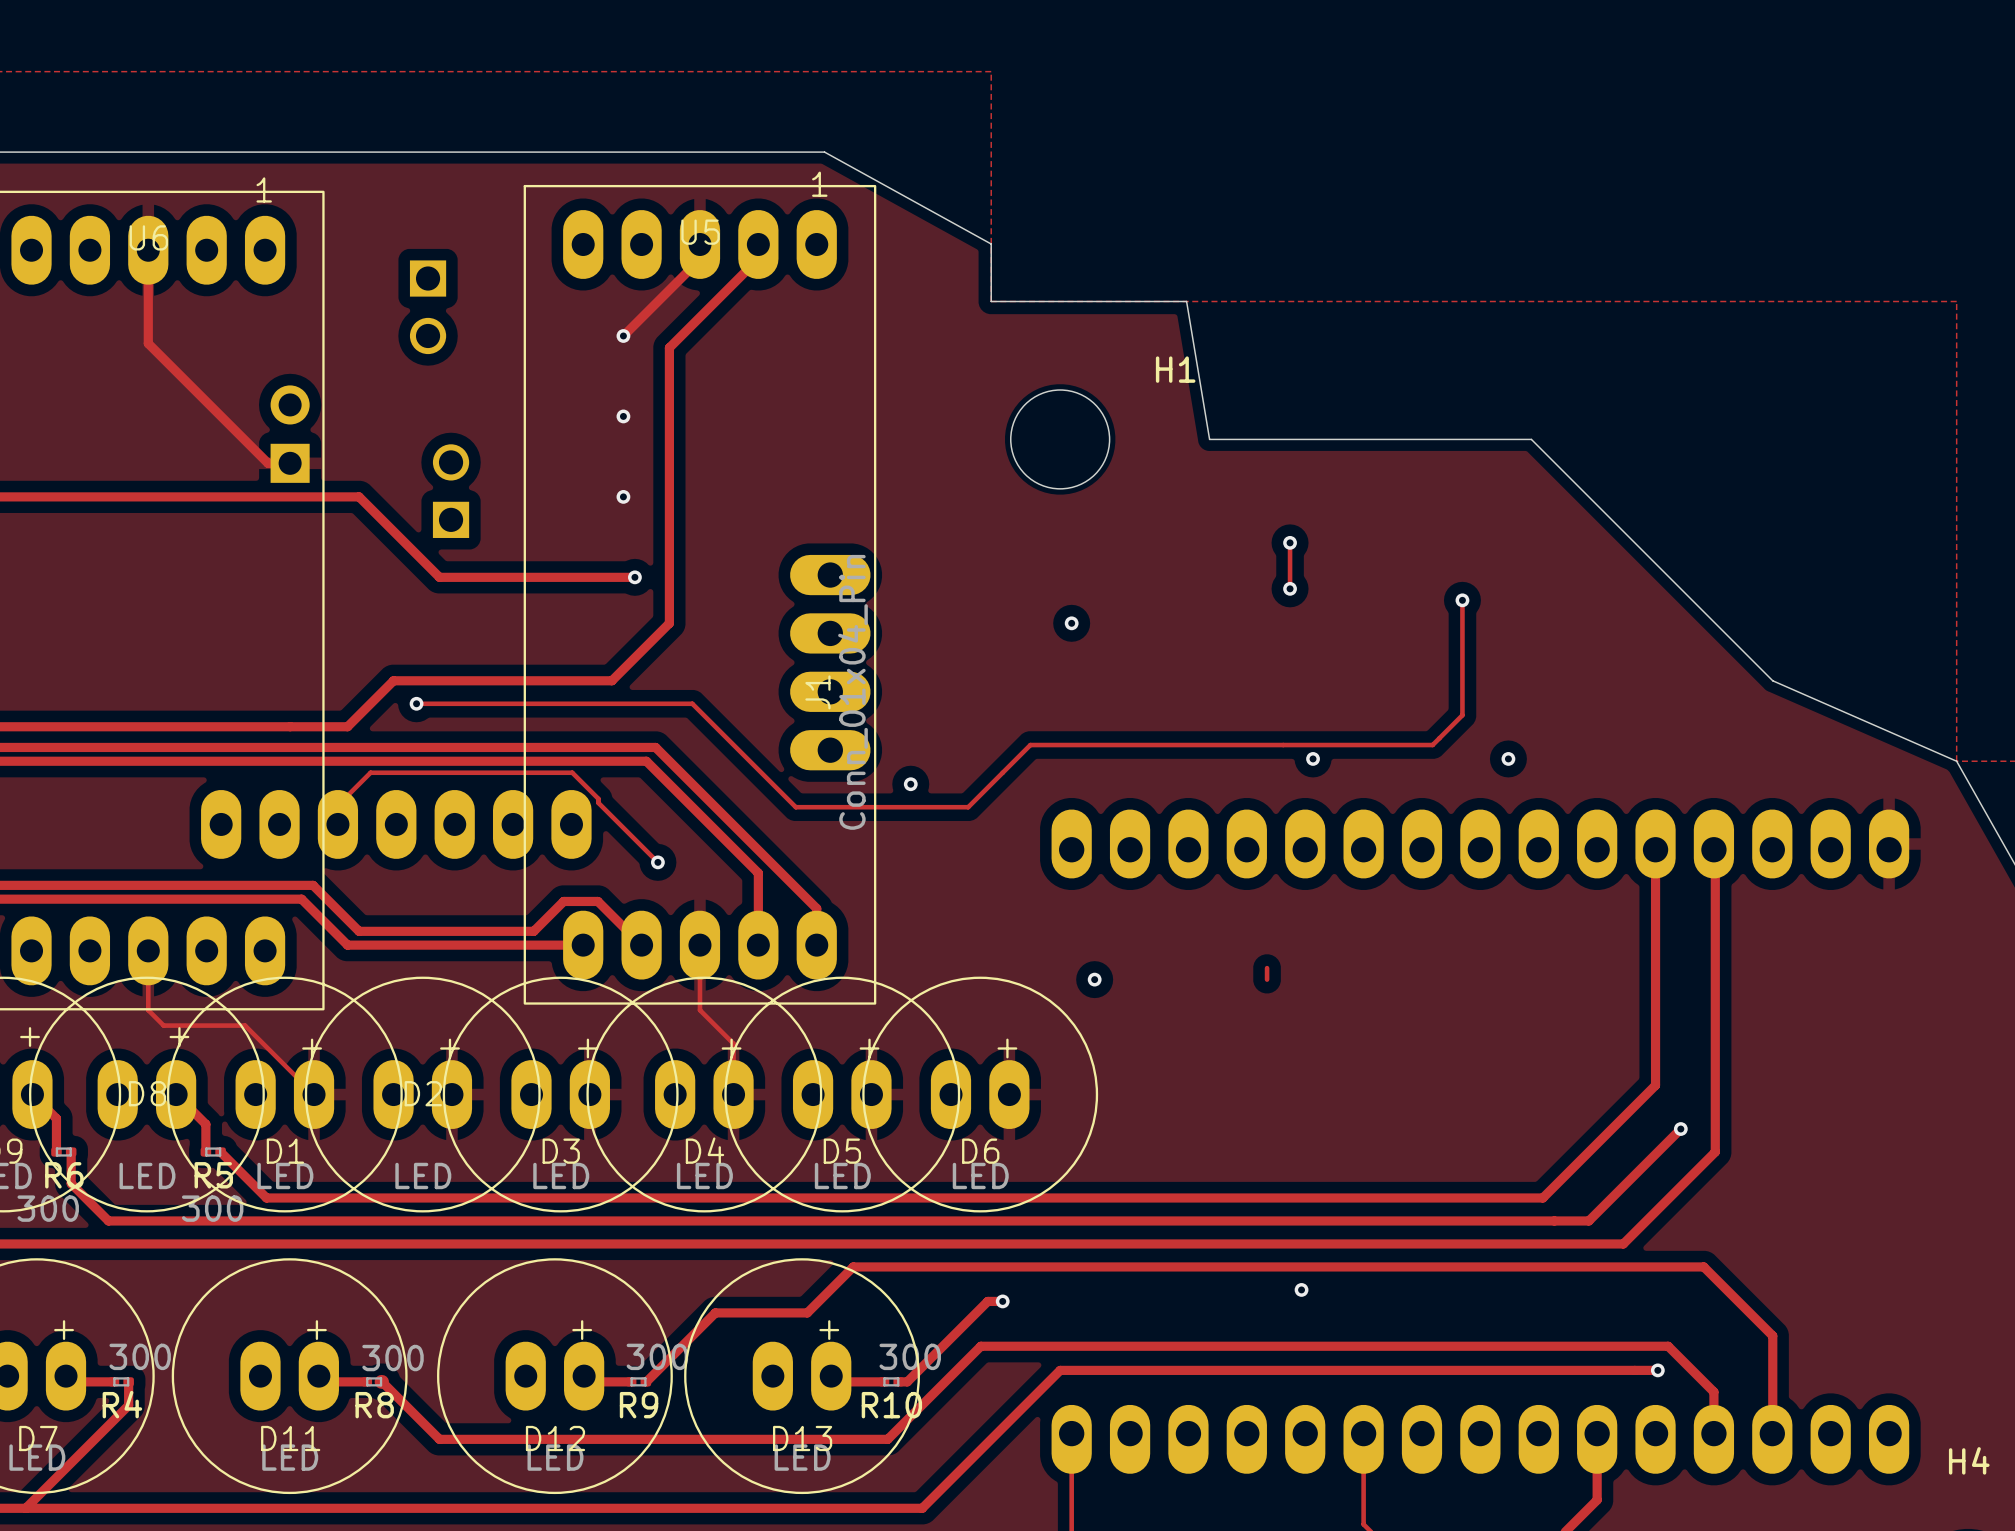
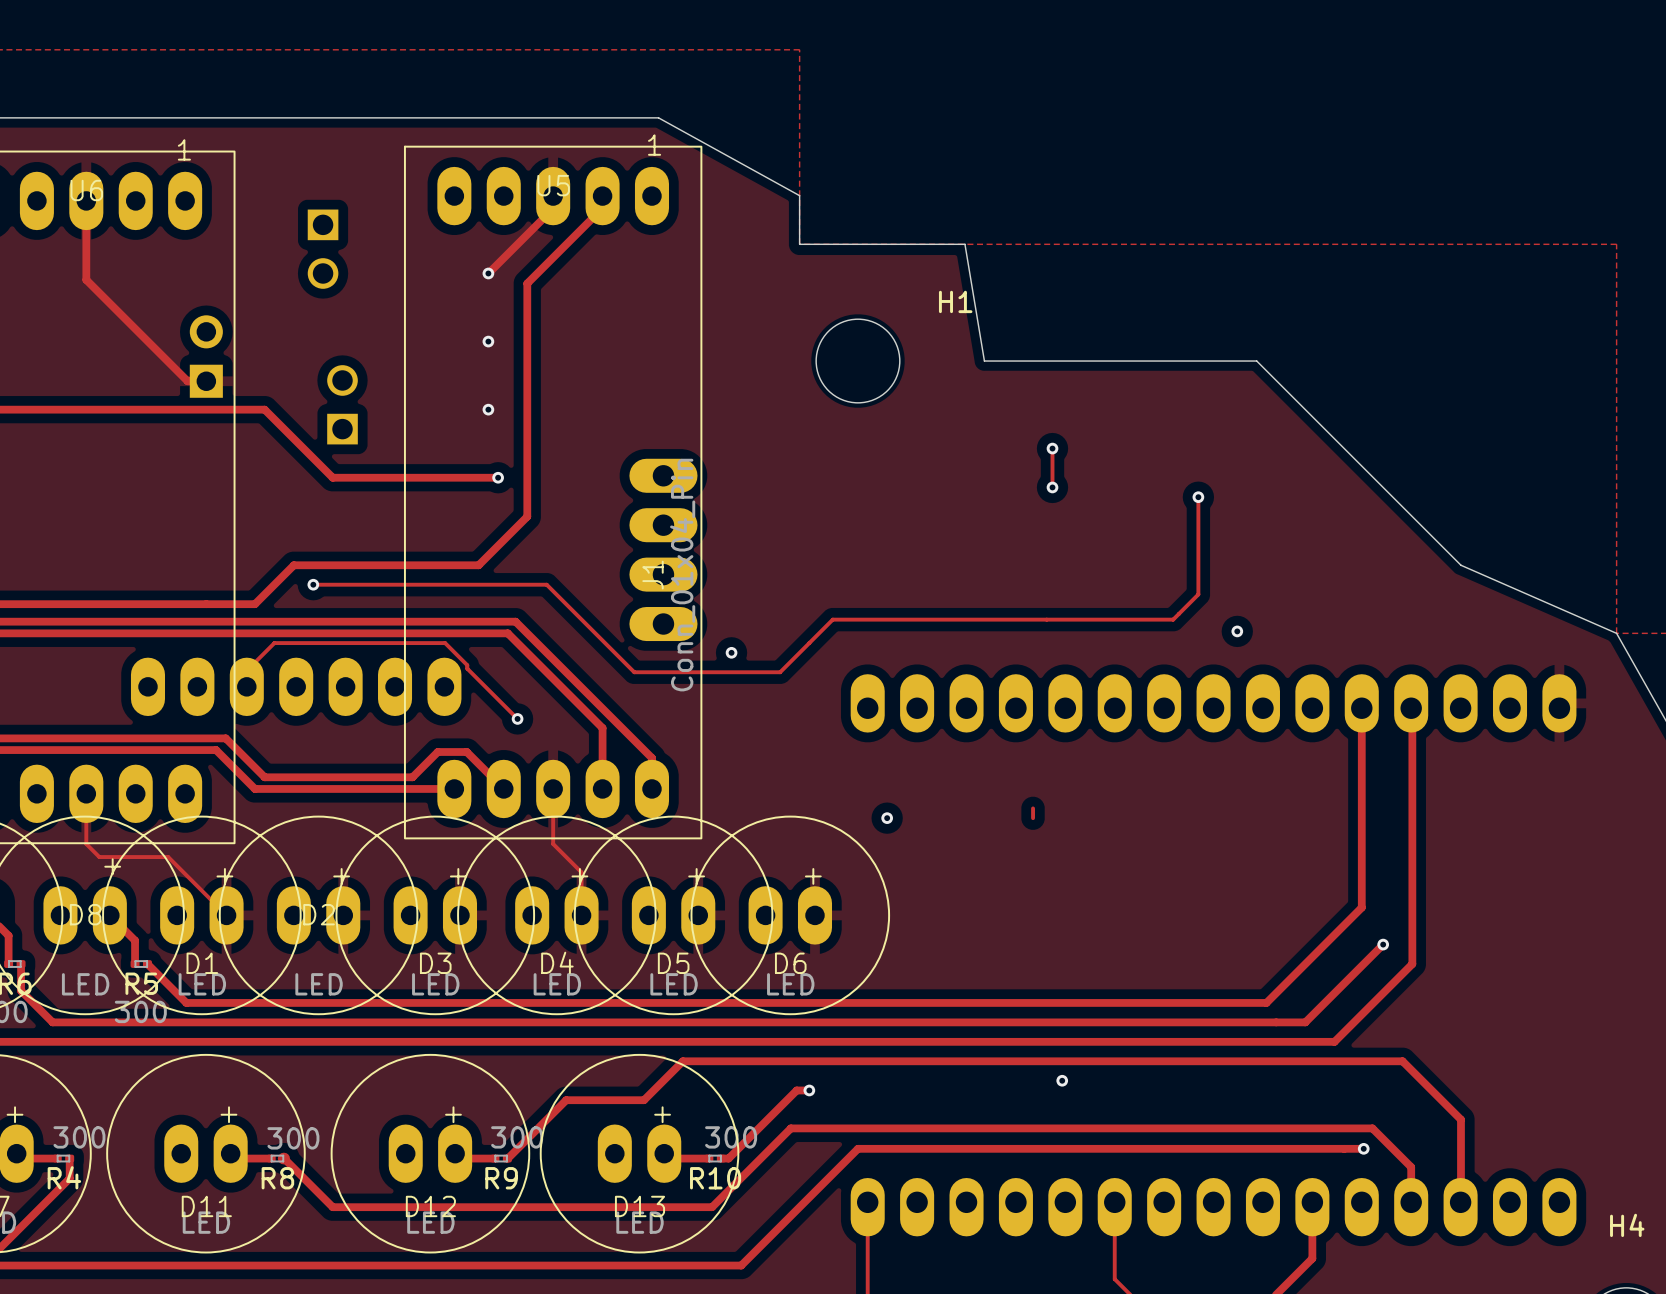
via: (1071, 623) -> none
via: (1313, 758) -> none

